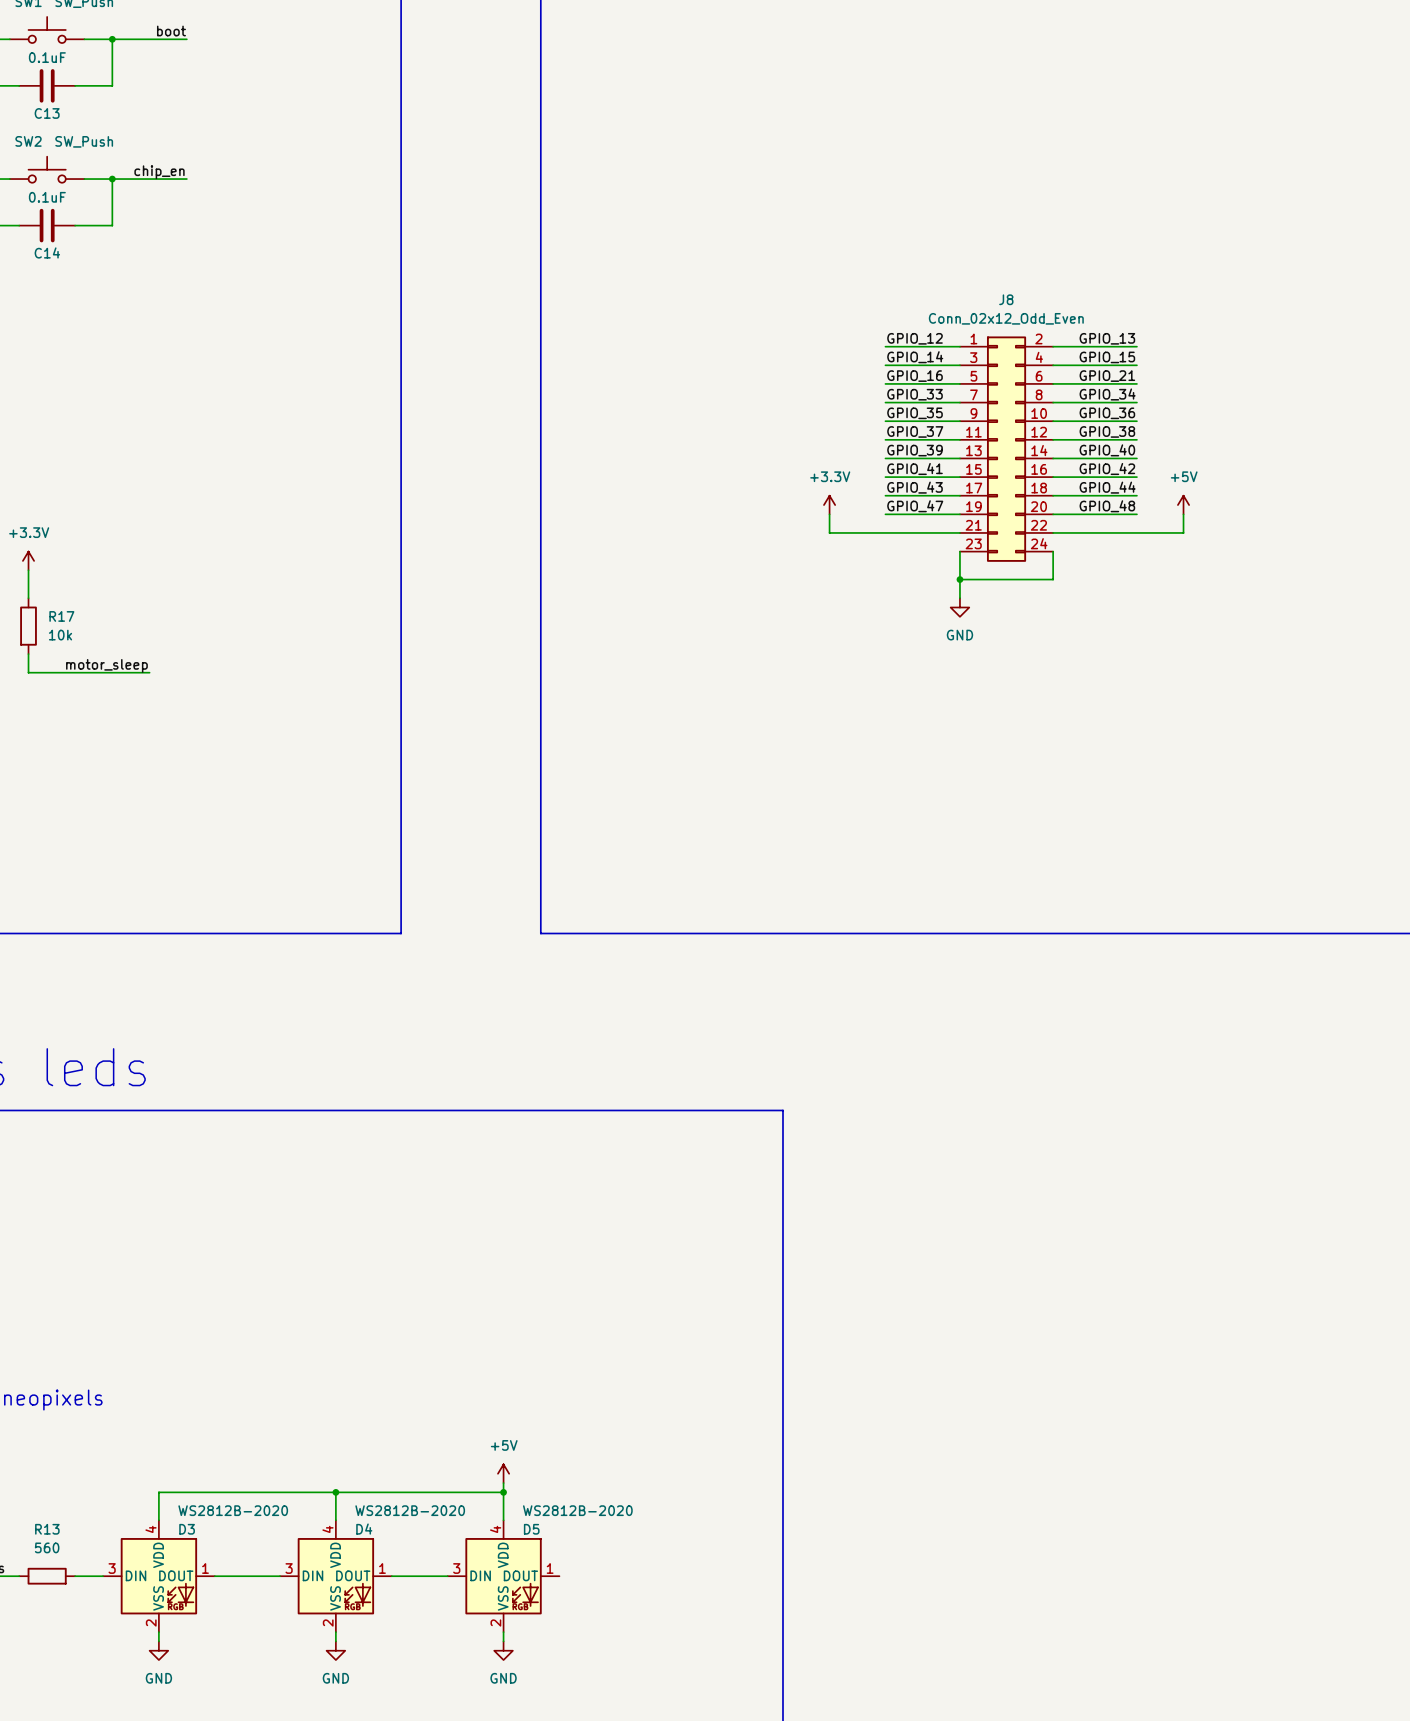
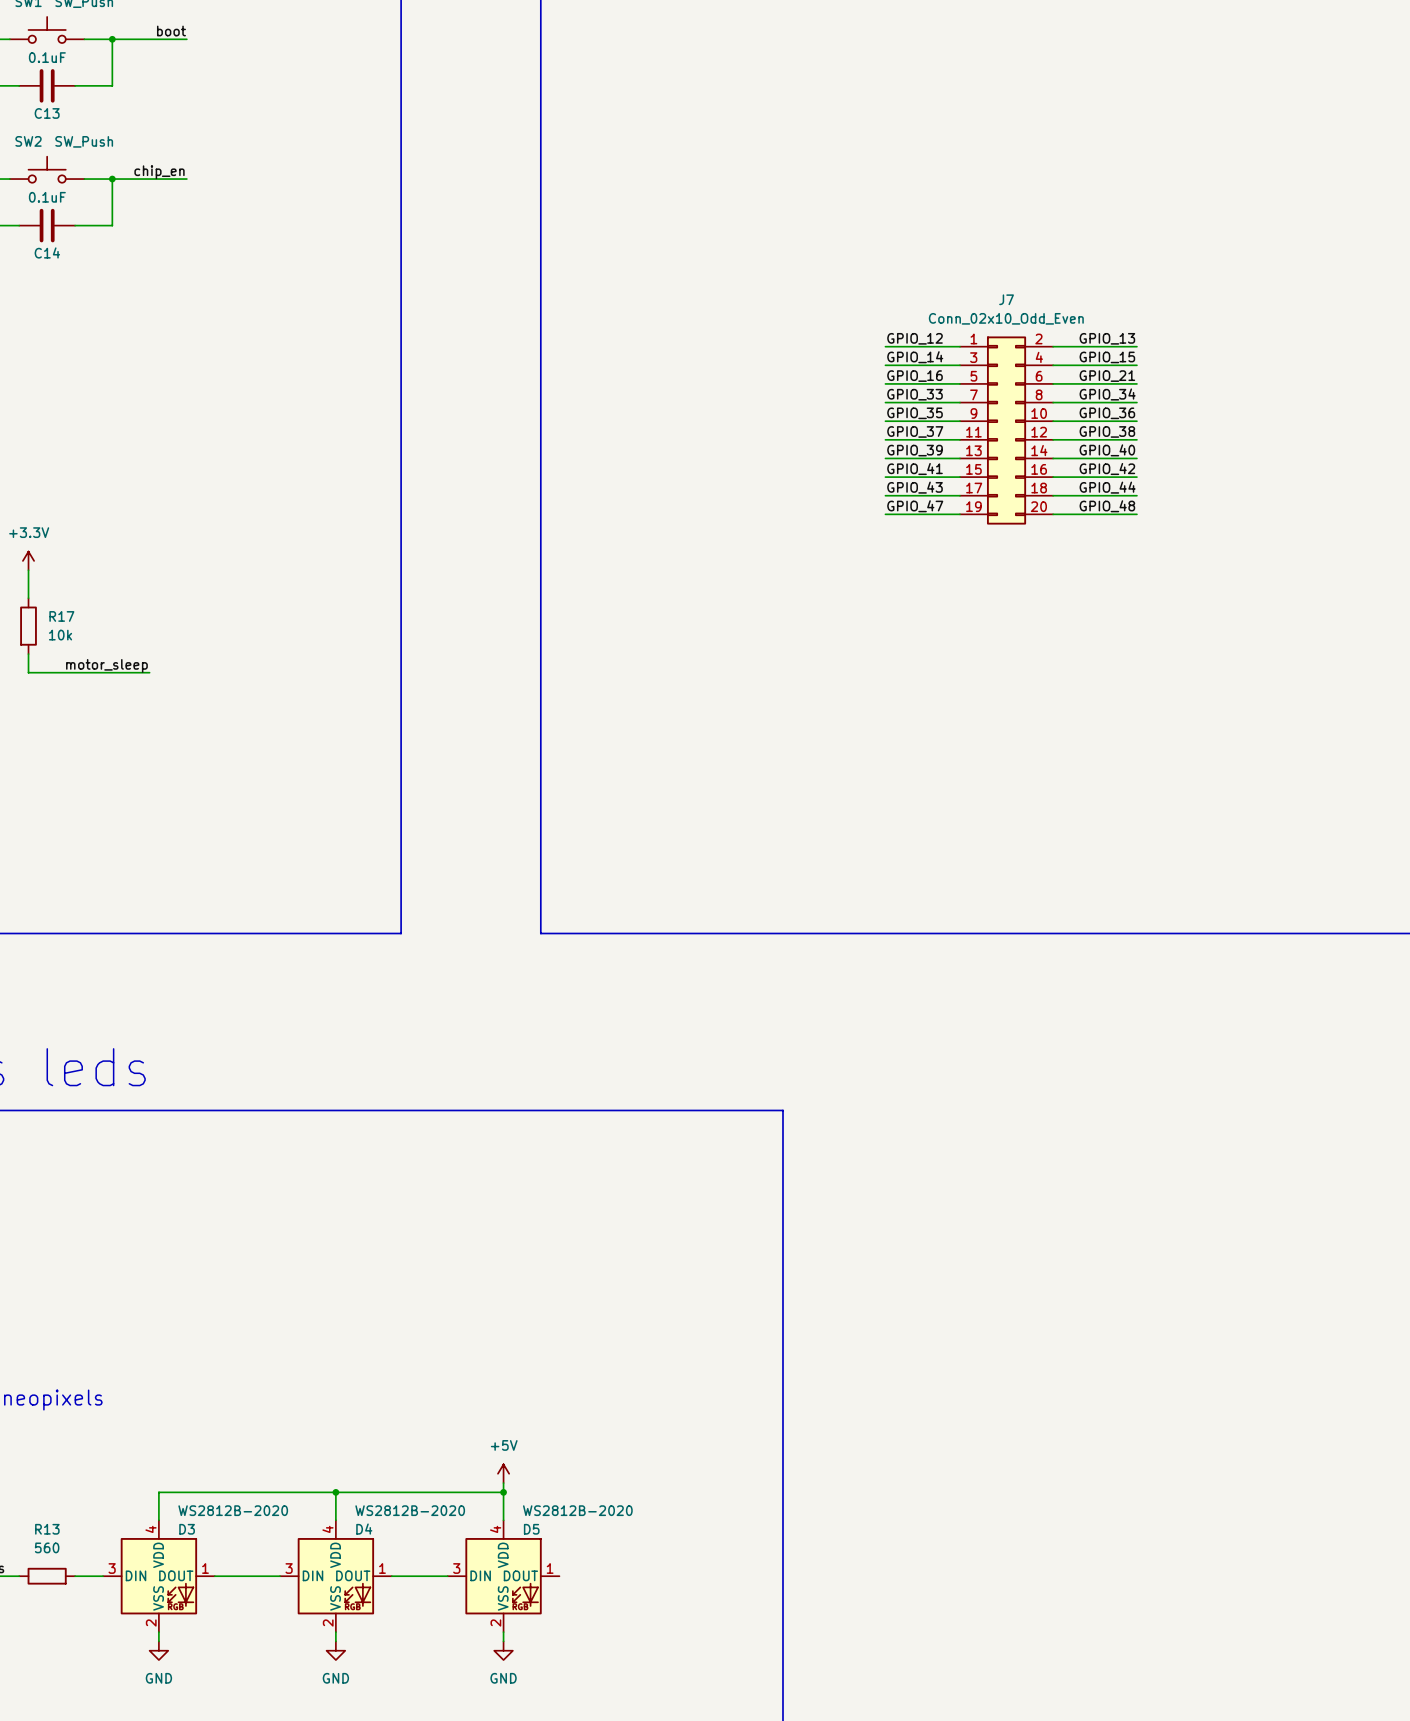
J7: none -> Conn_02x10_Odd_Even (1006, 430)
J8: Conn_02x12_Odd_Even (1006, 449) -> none
power symbol: +3.3V (829, 505) -> none
power symbol: +5V (1183, 505) -> none
wire: (829, 514) (829, 532) (959, 532) -> none
wire: (1183, 514) (1183, 532) (1053, 532) -> none
wire: (959, 551) (959, 598) -> none
wire: (1053, 551) (1053, 579) (959, 579) -> none
junction: (959, 579) -> none
power symbol: GND (959, 607) -> none

